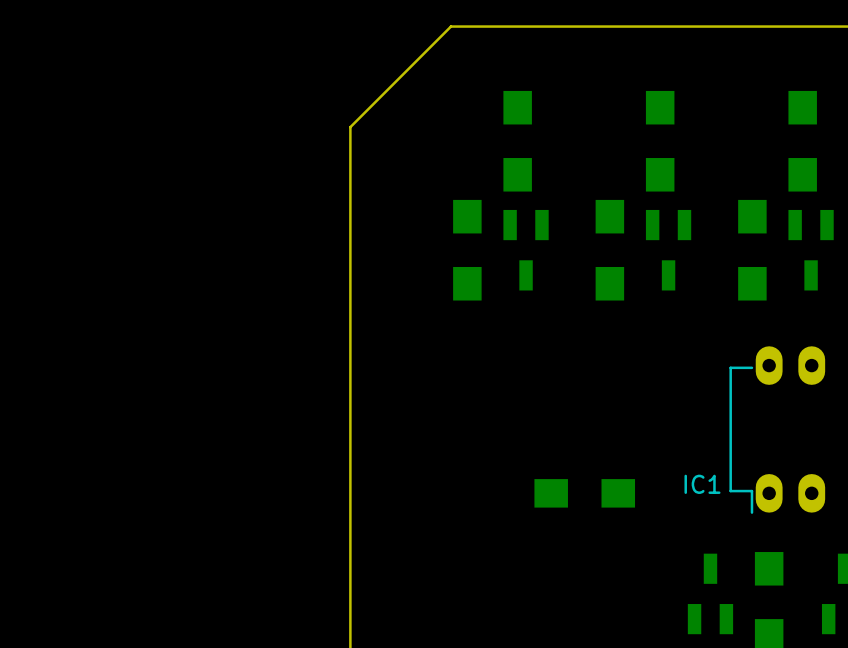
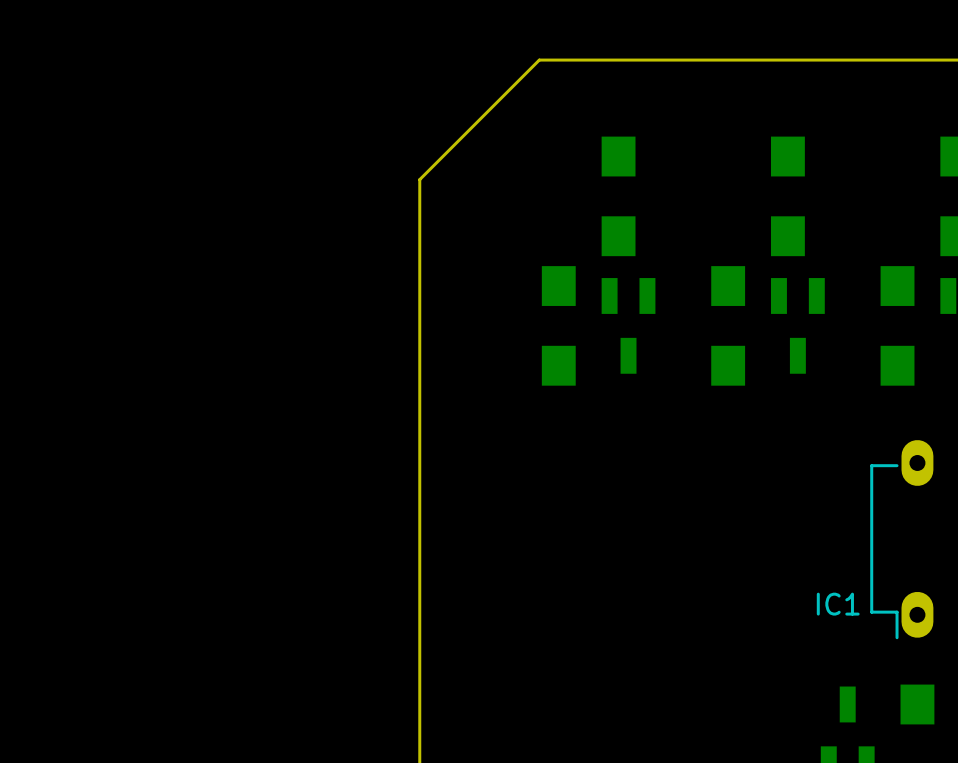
part: (584, 493) -> none

